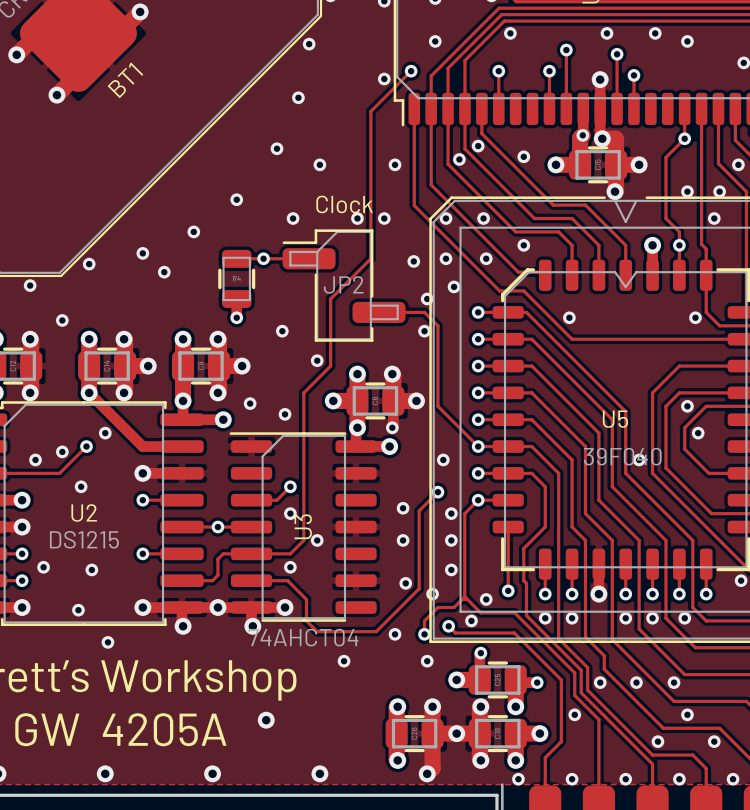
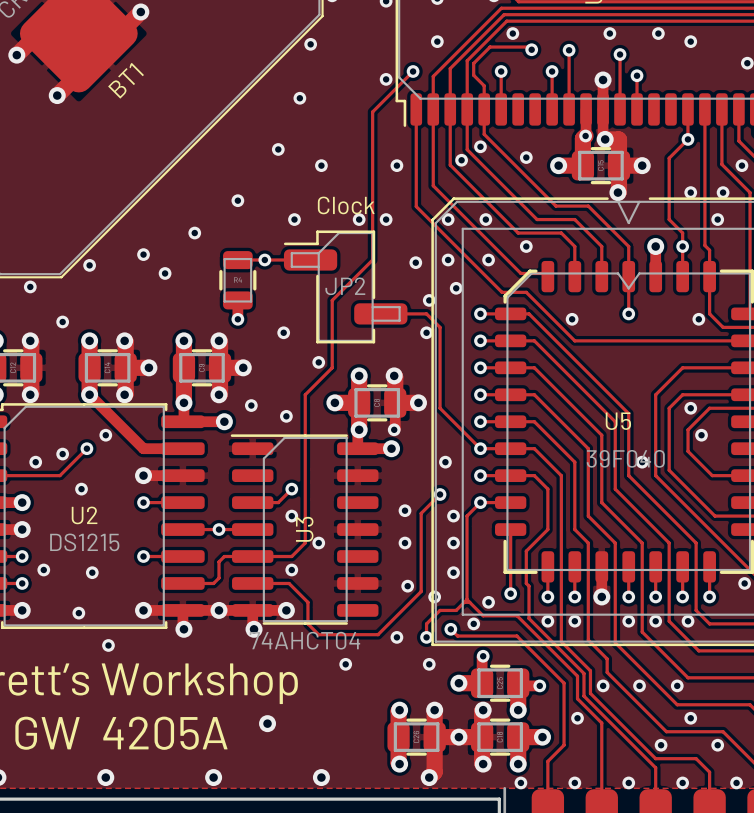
track: none -> (531, 49) (528, 47) (490, 47) (473, 63) (473, 75) (484, 85) (484, 109)
via: none -> (531, 49)
track: none -> (628, 276) (628, 313)
via: none -> (628, 313)

